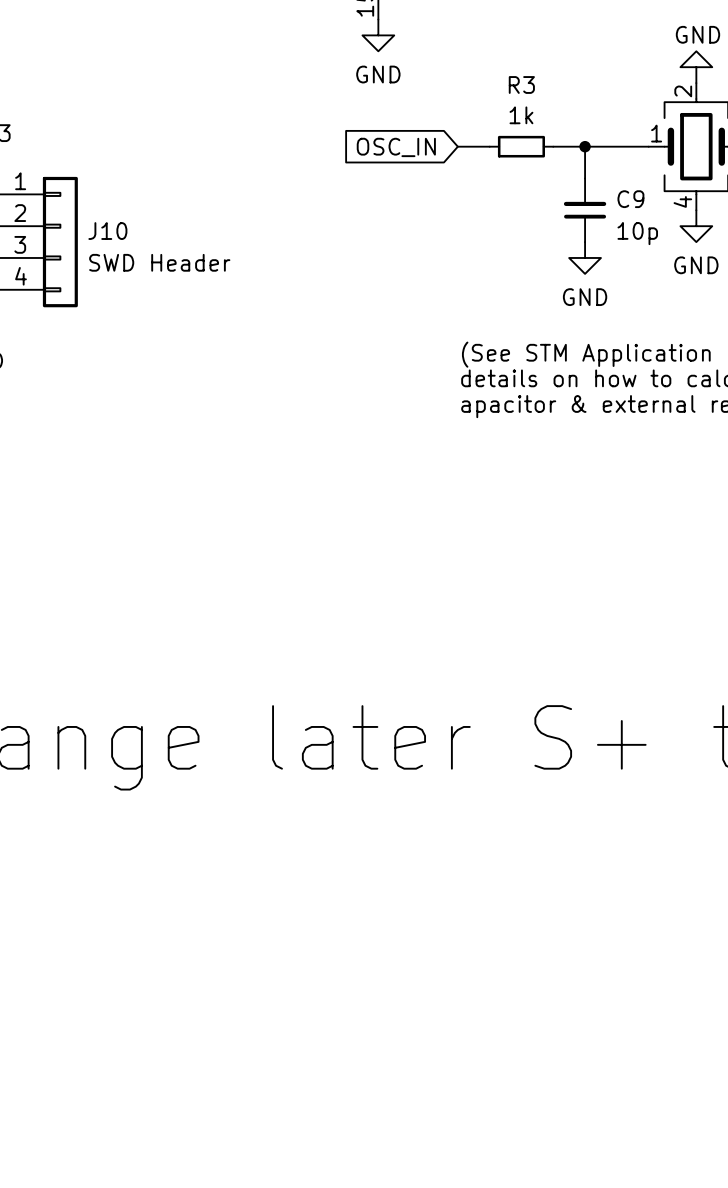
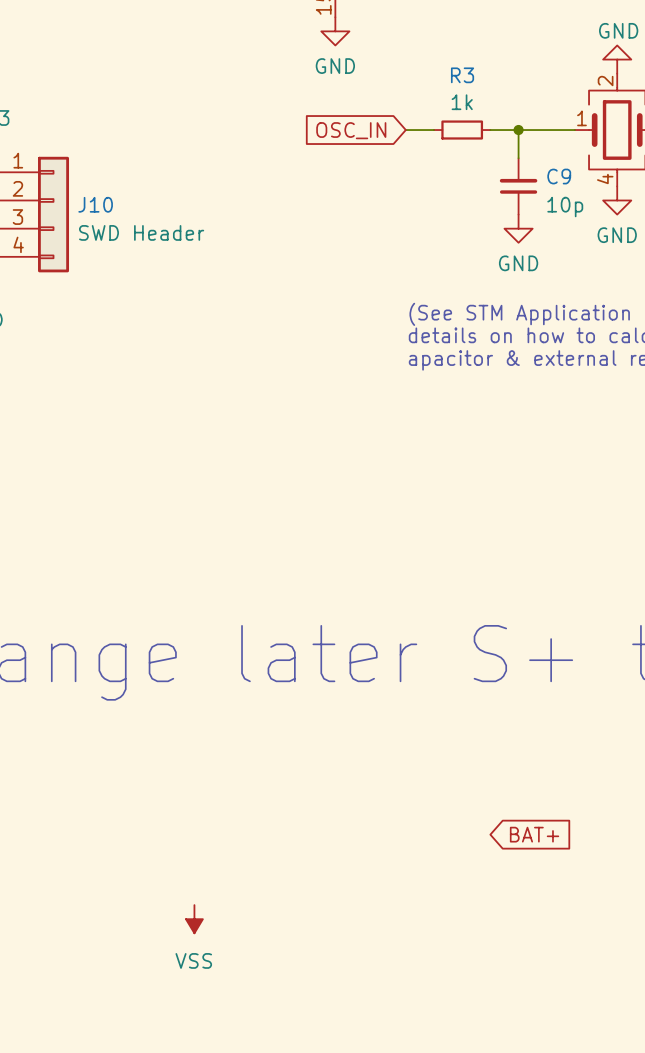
global label: none -> BAT+ (534, 834)
power symbol: none -> VSS (194, 919)

